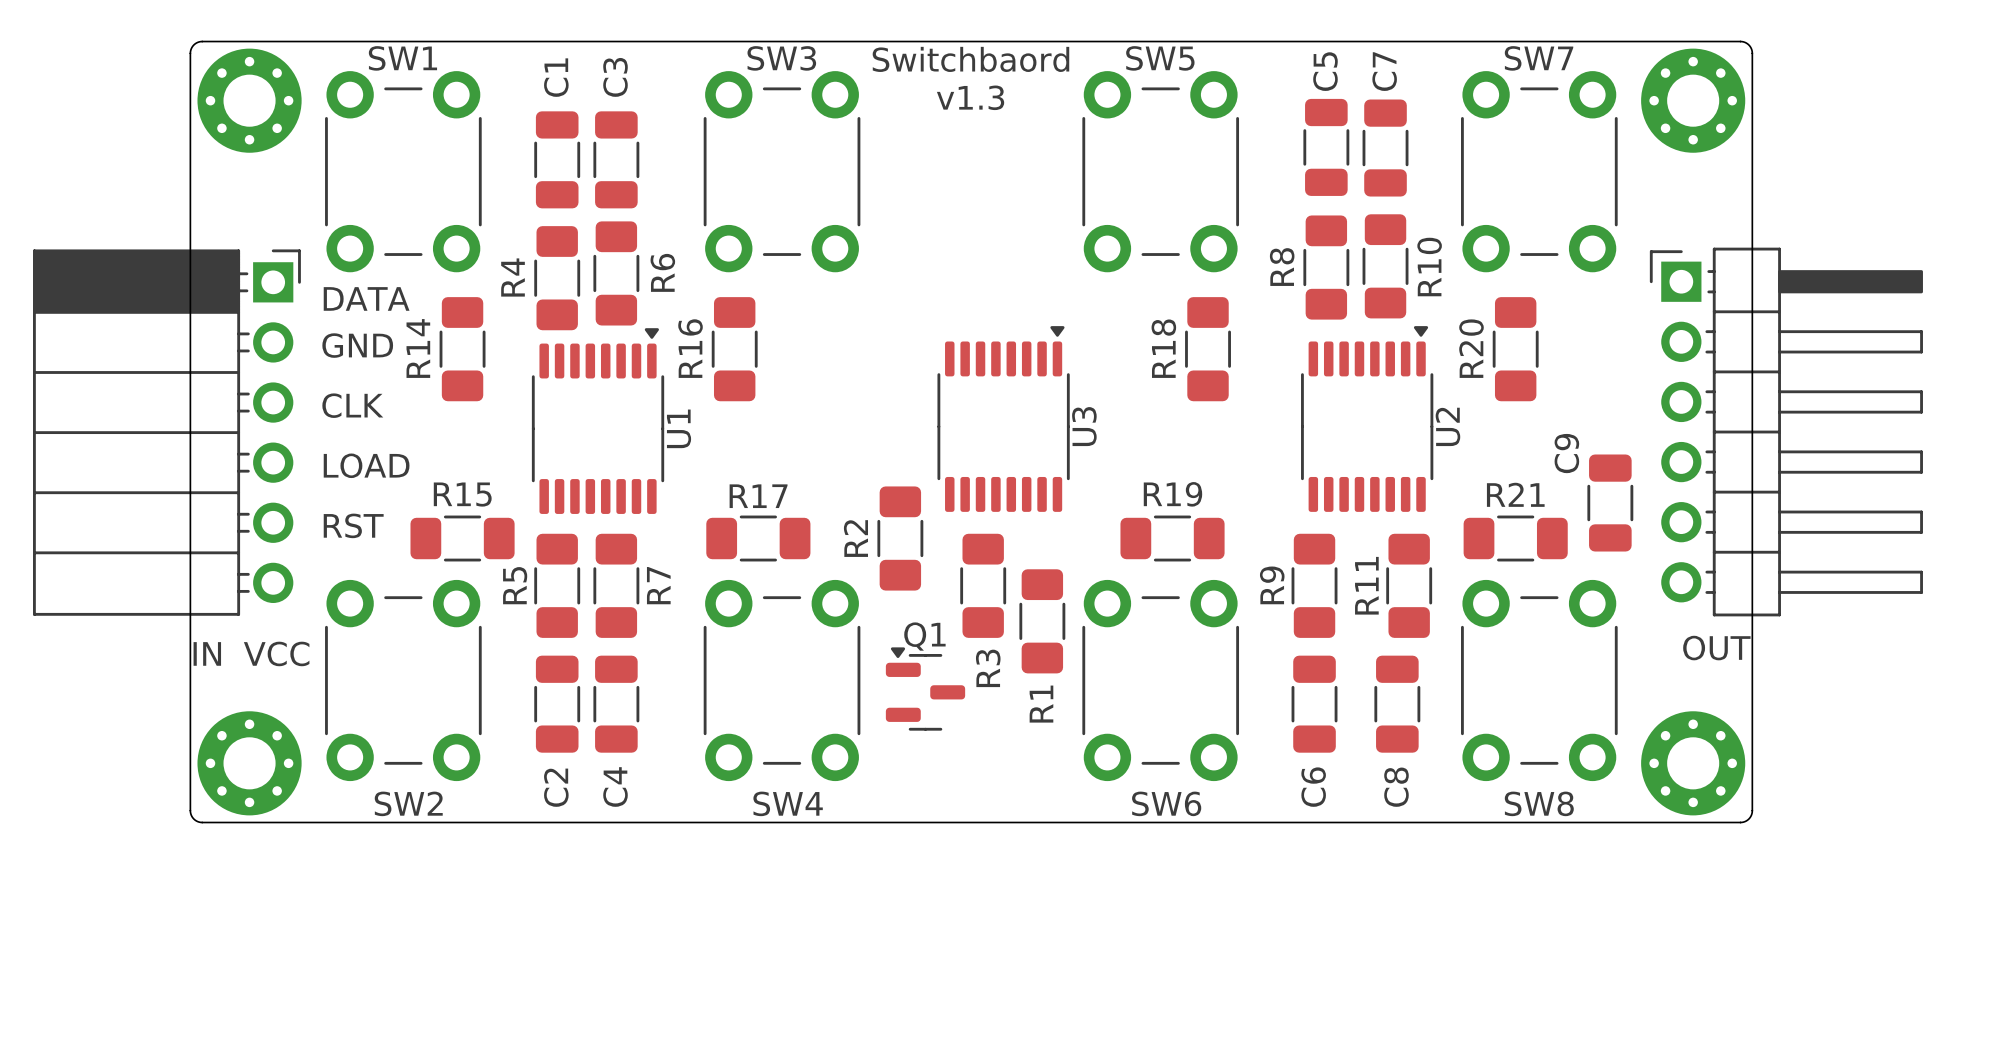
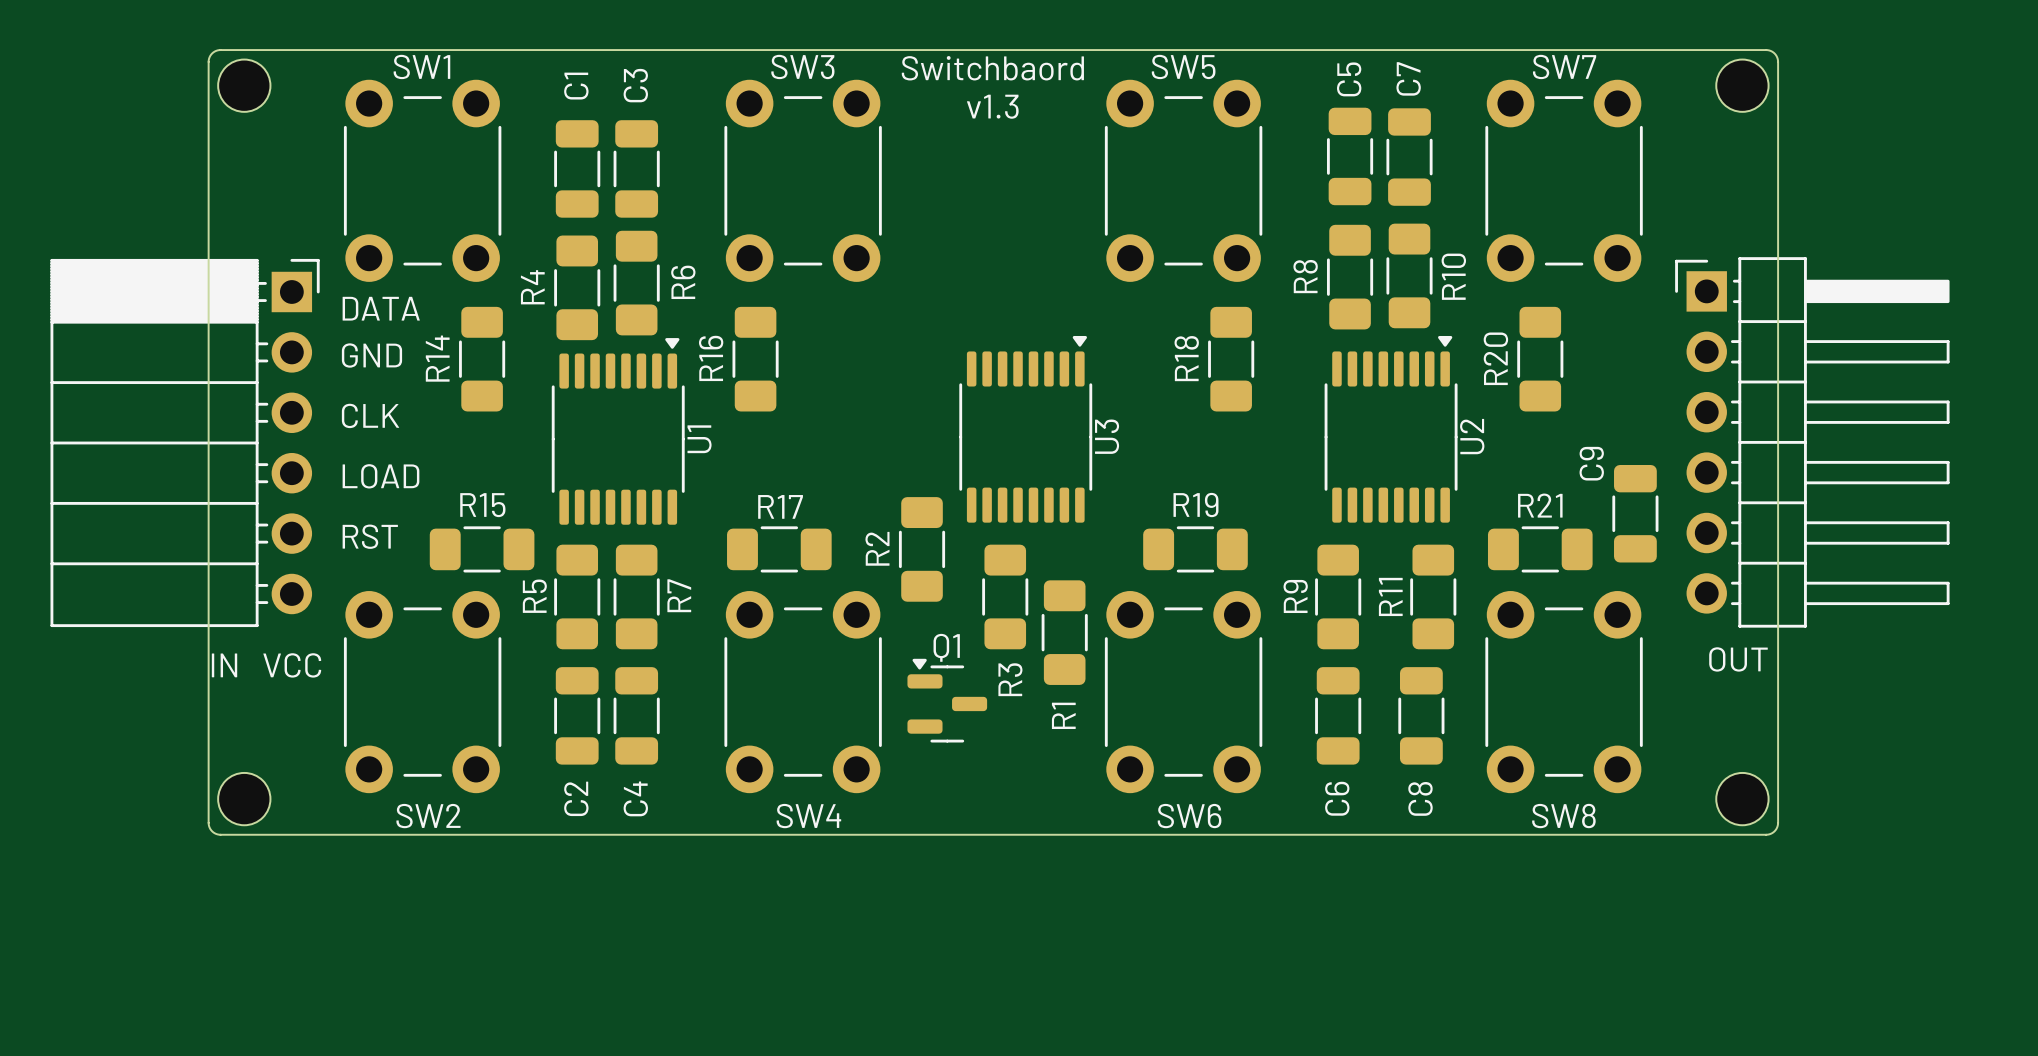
part: none -> (244, 85)
part: none -> (1742, 85)
part: (249, 100) -> none
part: (1693, 100) -> none
part: (249, 763) -> none
part: (1693, 763) -> none
part: none -> (244, 799)
part: none -> (1742, 799)

